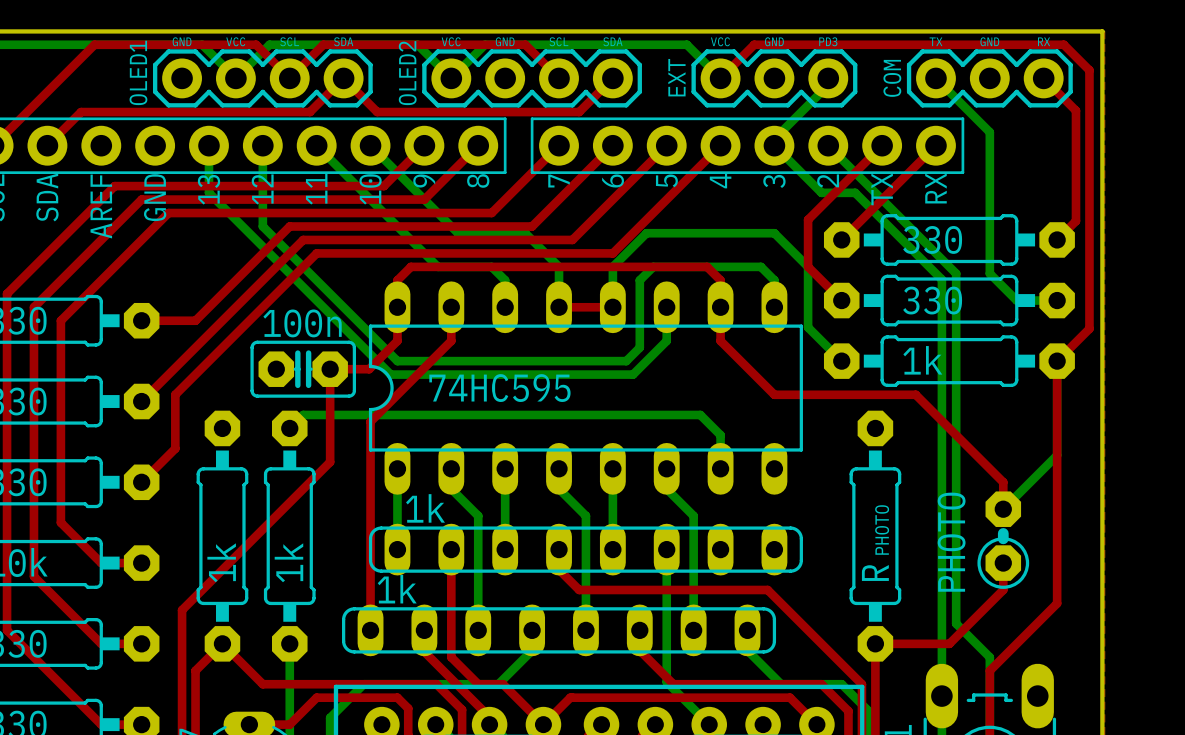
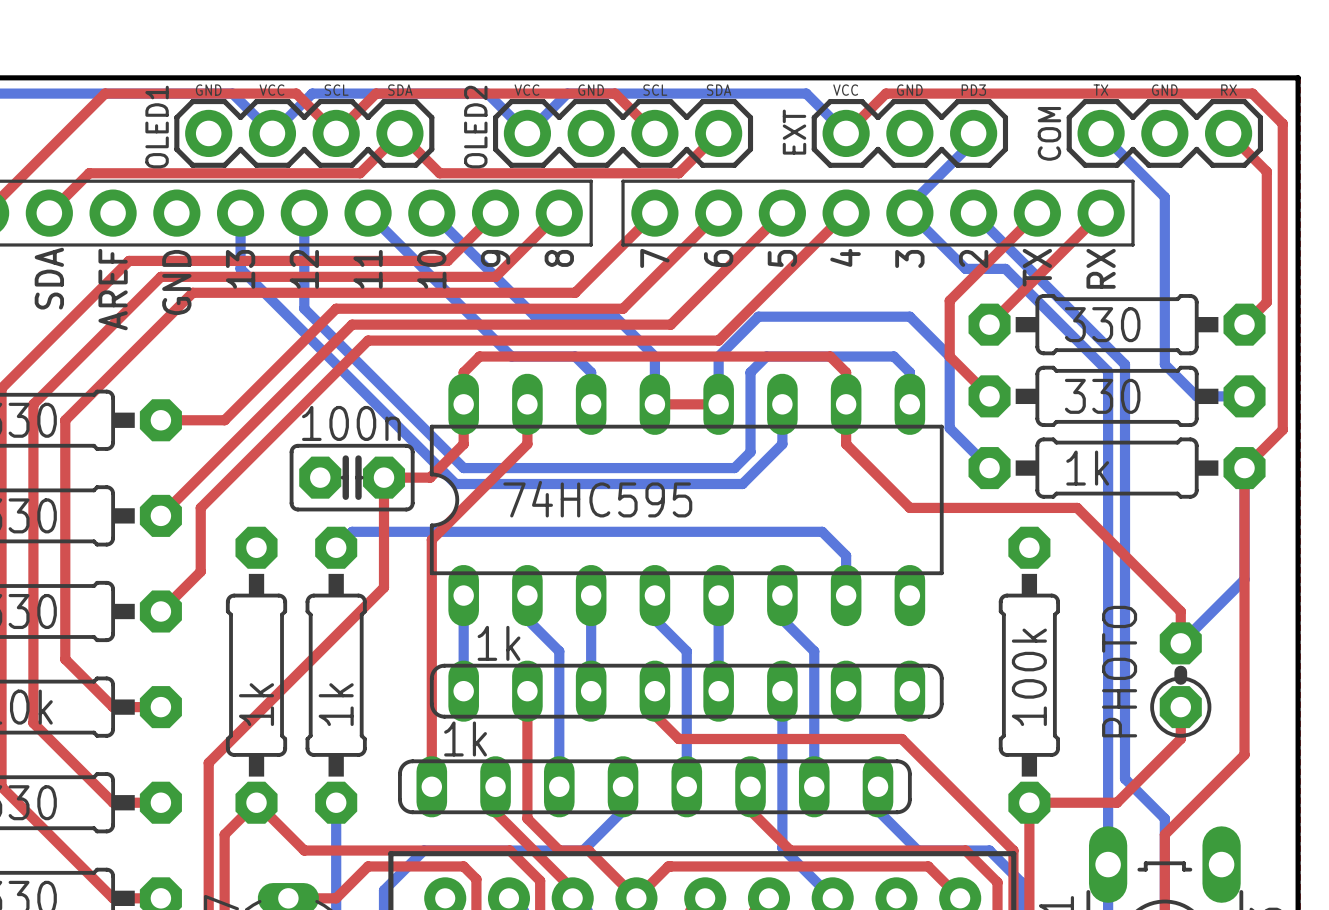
text: PHOTO (882, 530) -> none
part value: R (875, 572) -> 100k (1029, 677)

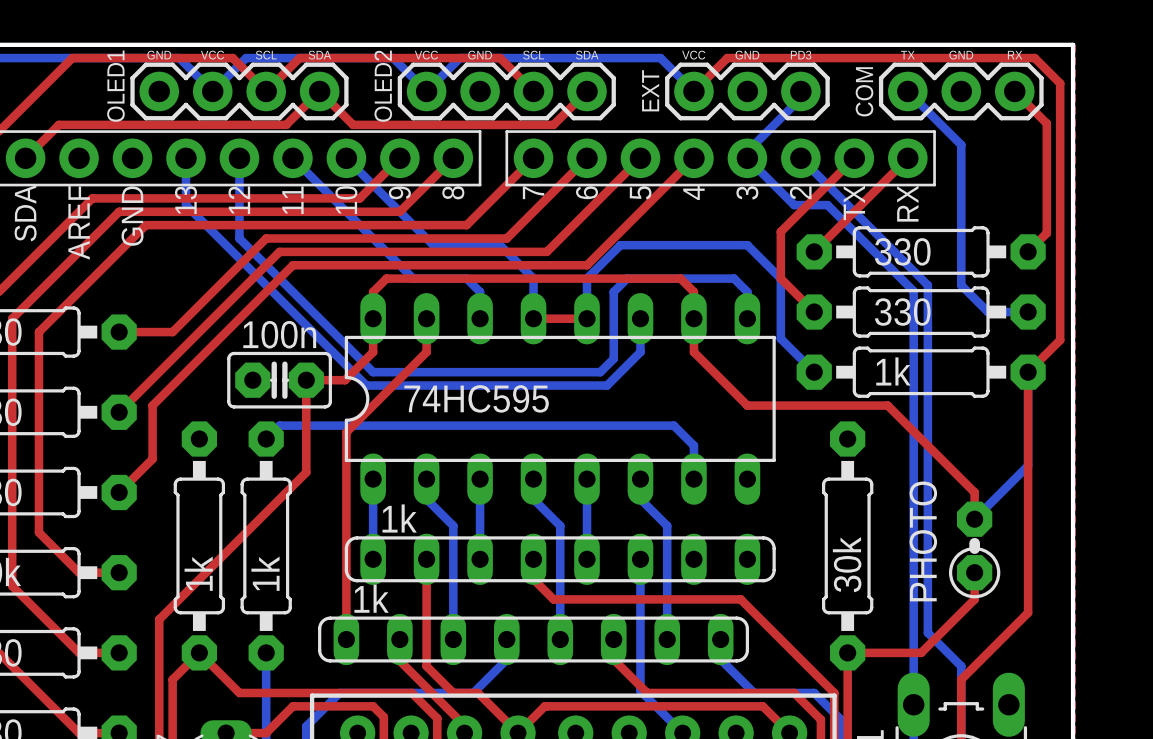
part value: 100k (1029, 677) -> 30k (847, 564)

